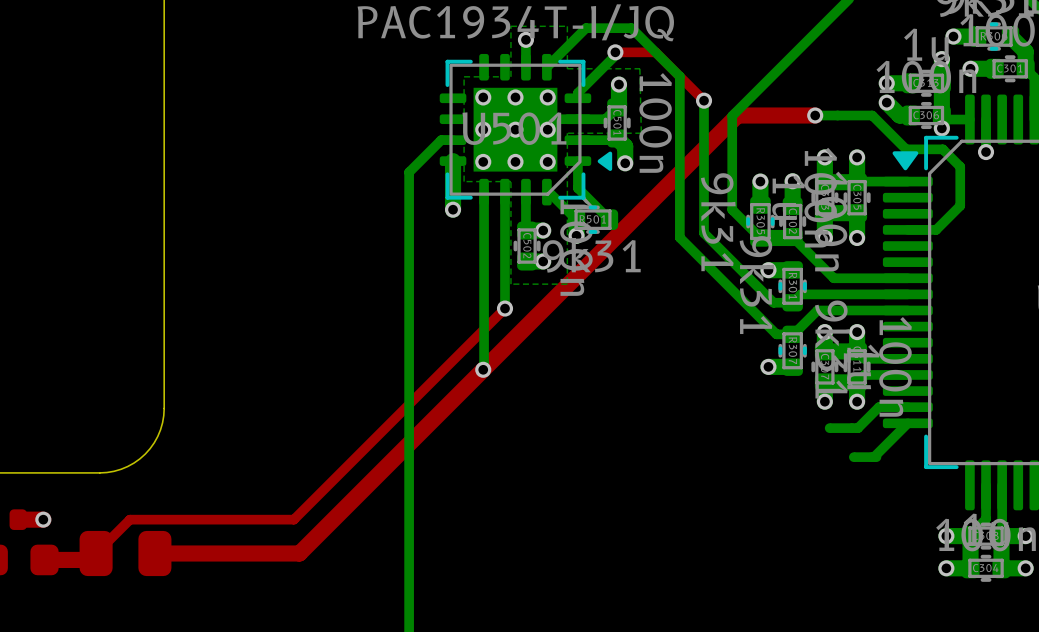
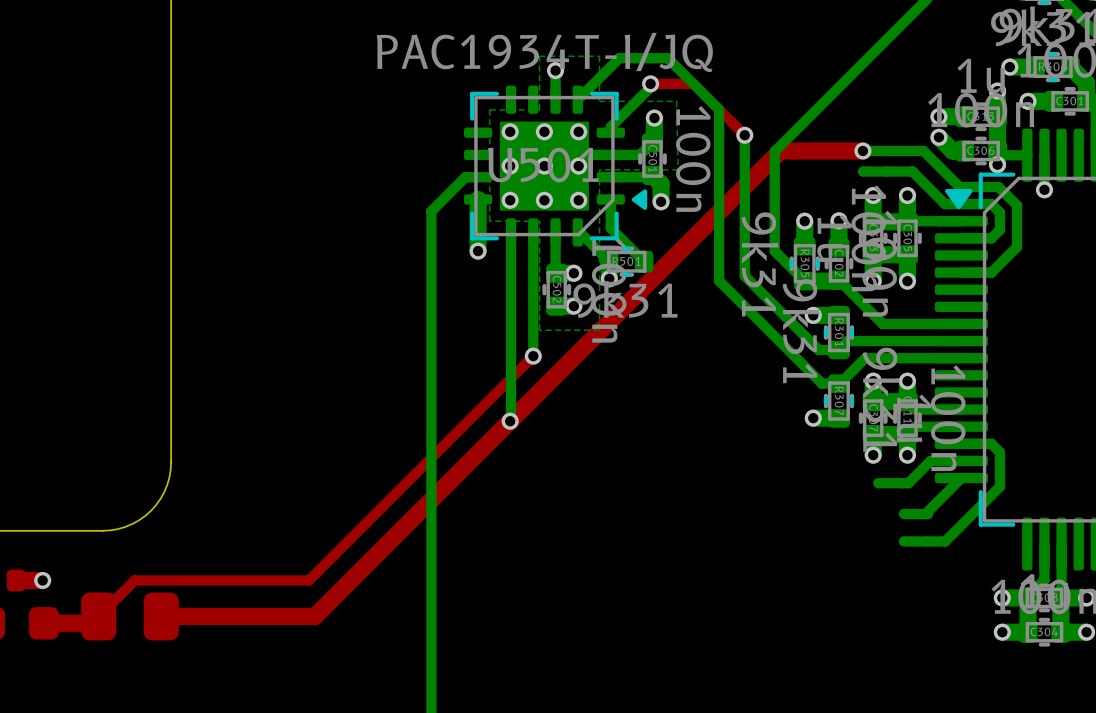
part: none -> (874, 171)
bottom track: none -> (886, 171) (912, 171) (945, 204) (991, 204) (999, 212) (999, 229) (991, 238) (961, 238)
bottom track: none -> (961, 443) (991, 443) (999, 452) (999, 486) (945, 541) (928, 541)
part: none -> (916, 541)

